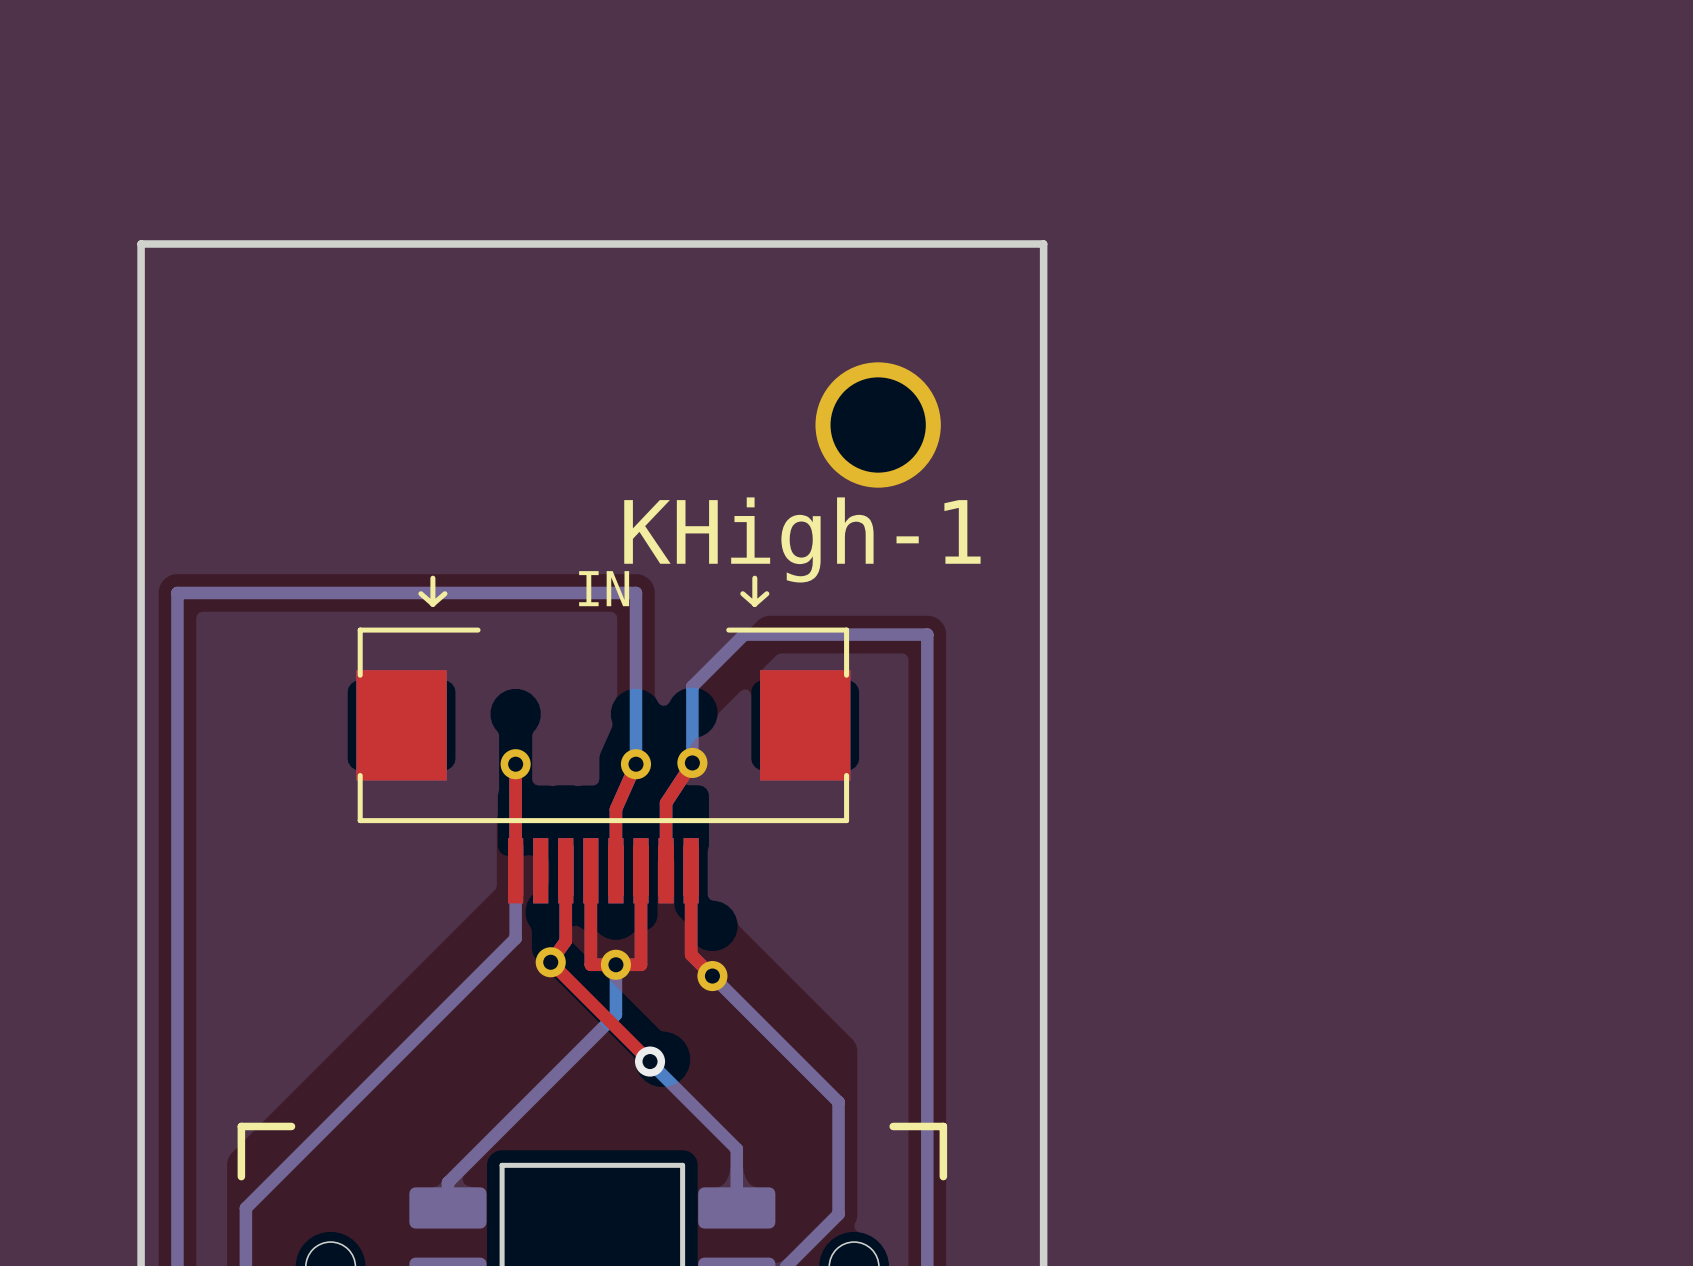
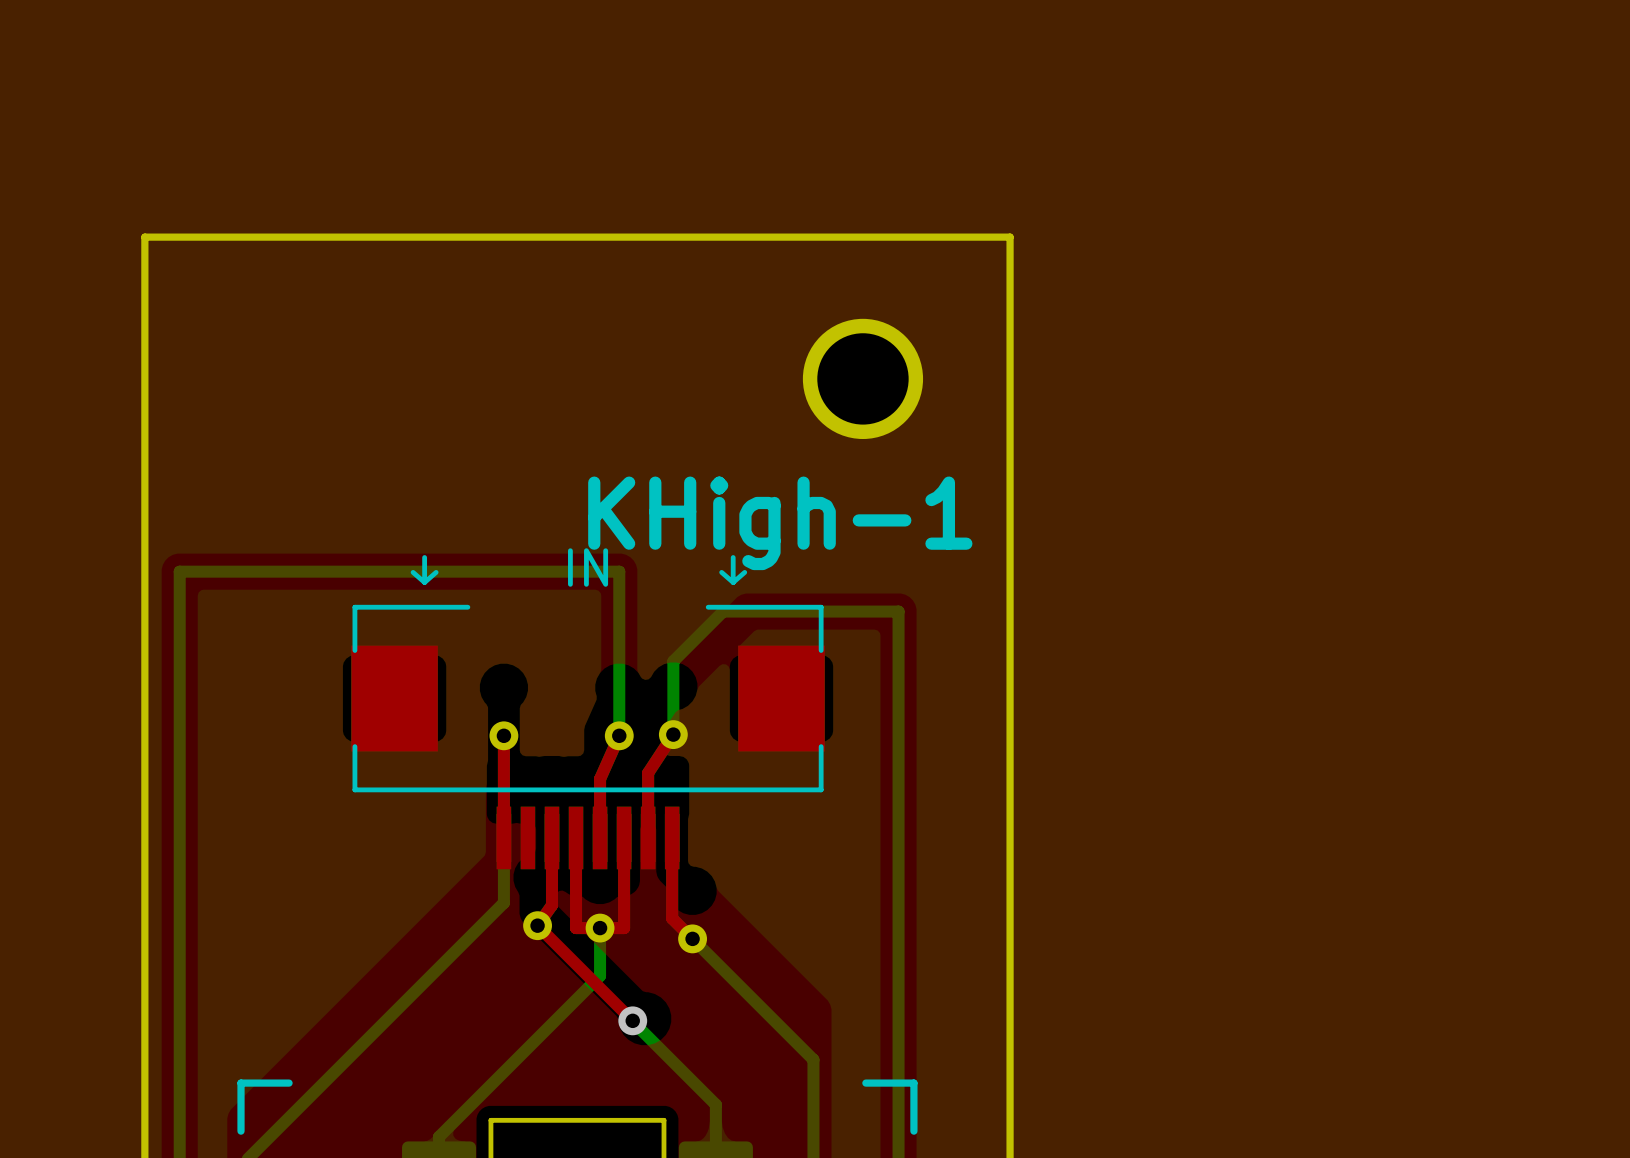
part position: (878, 425) -> (862, 378)

